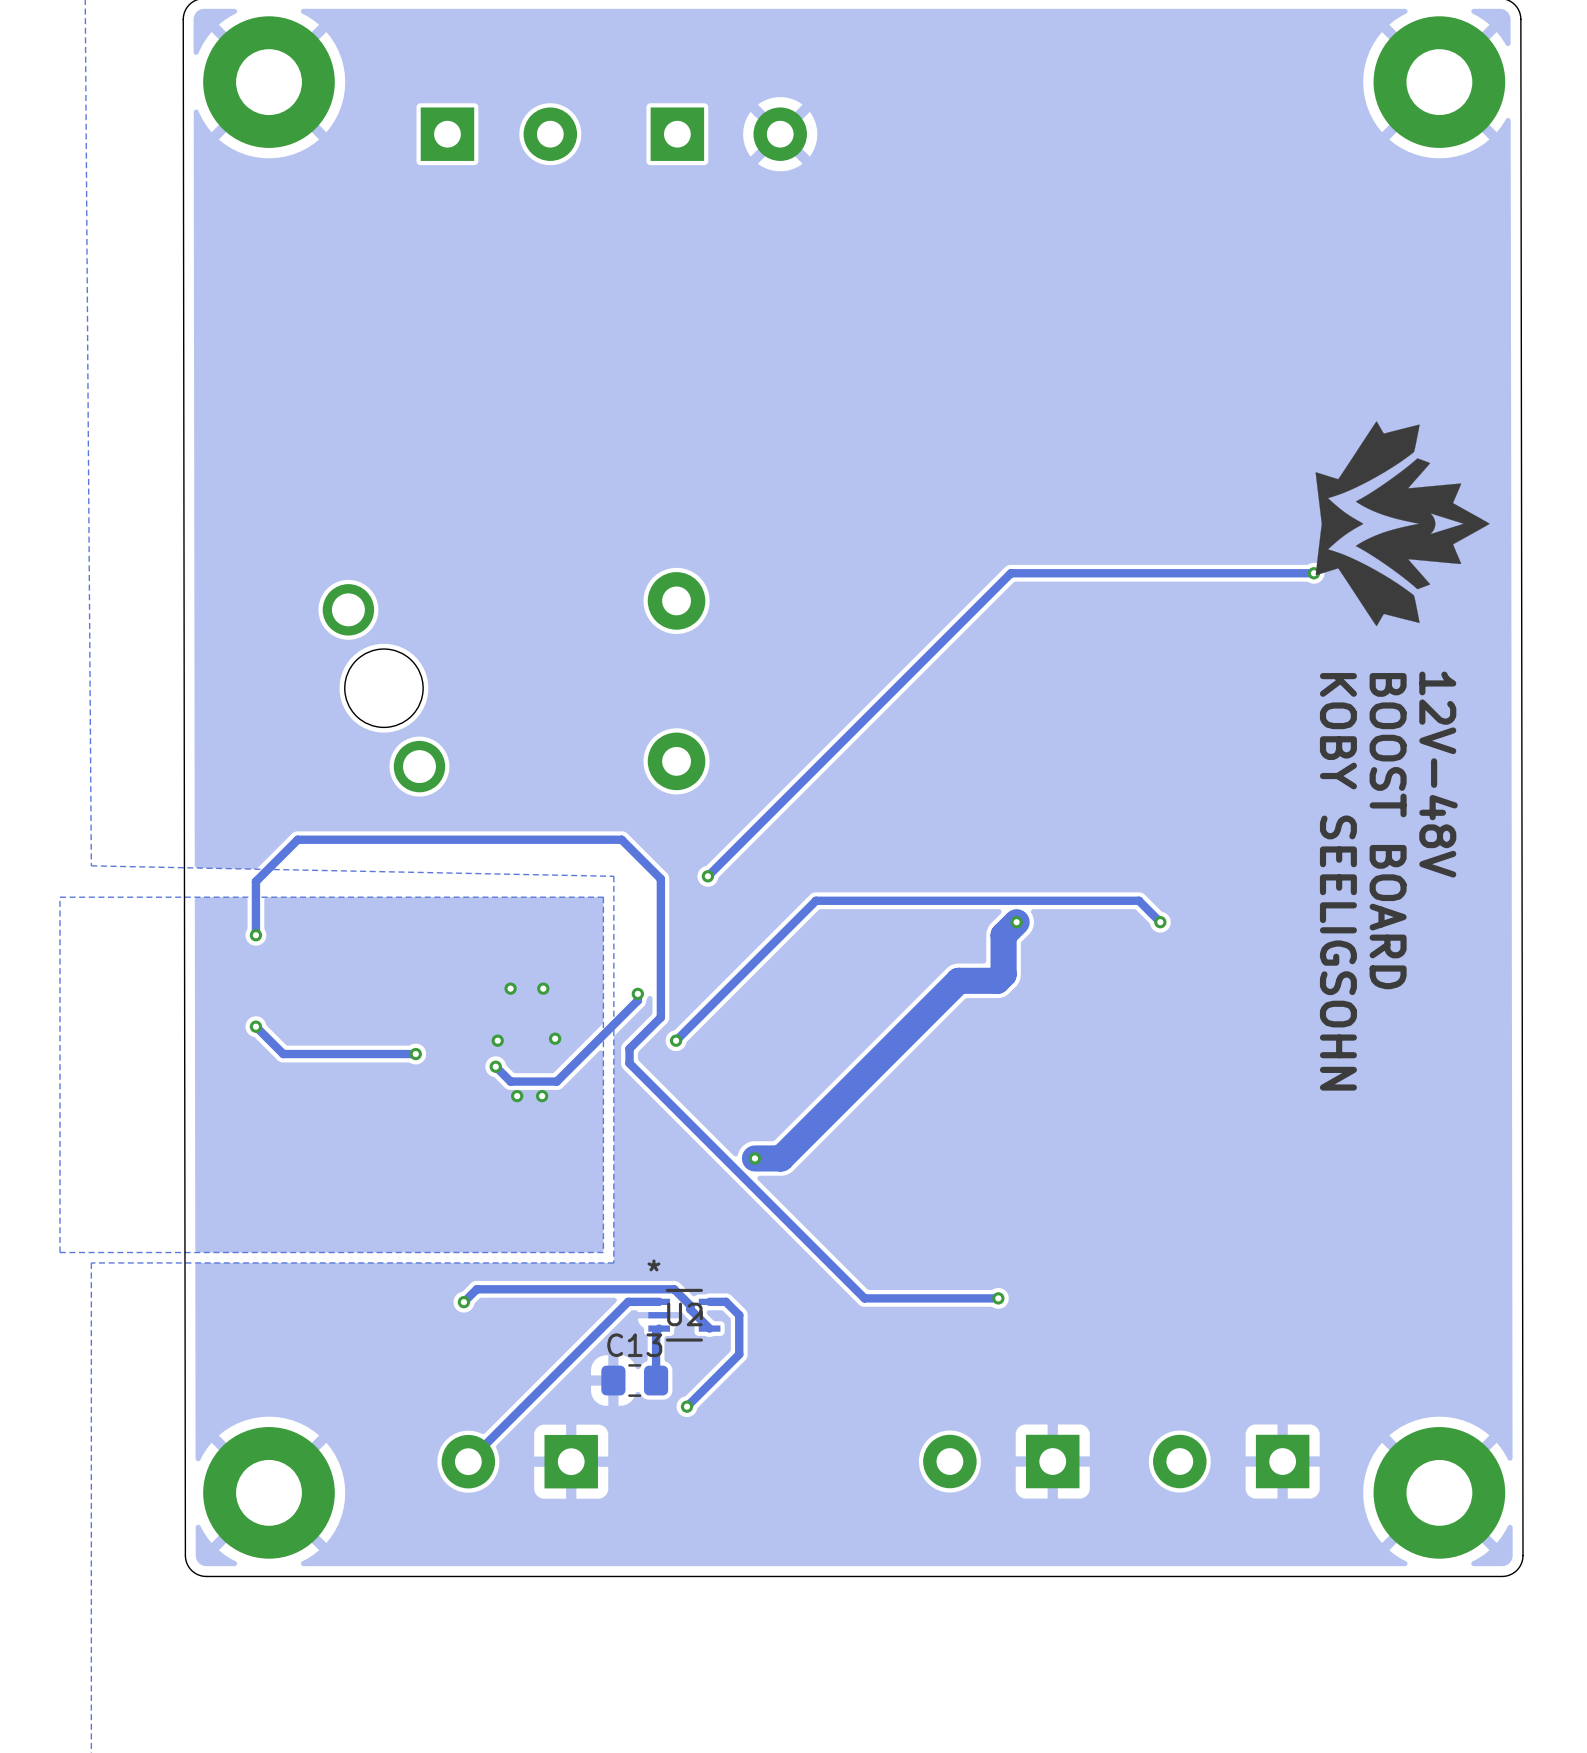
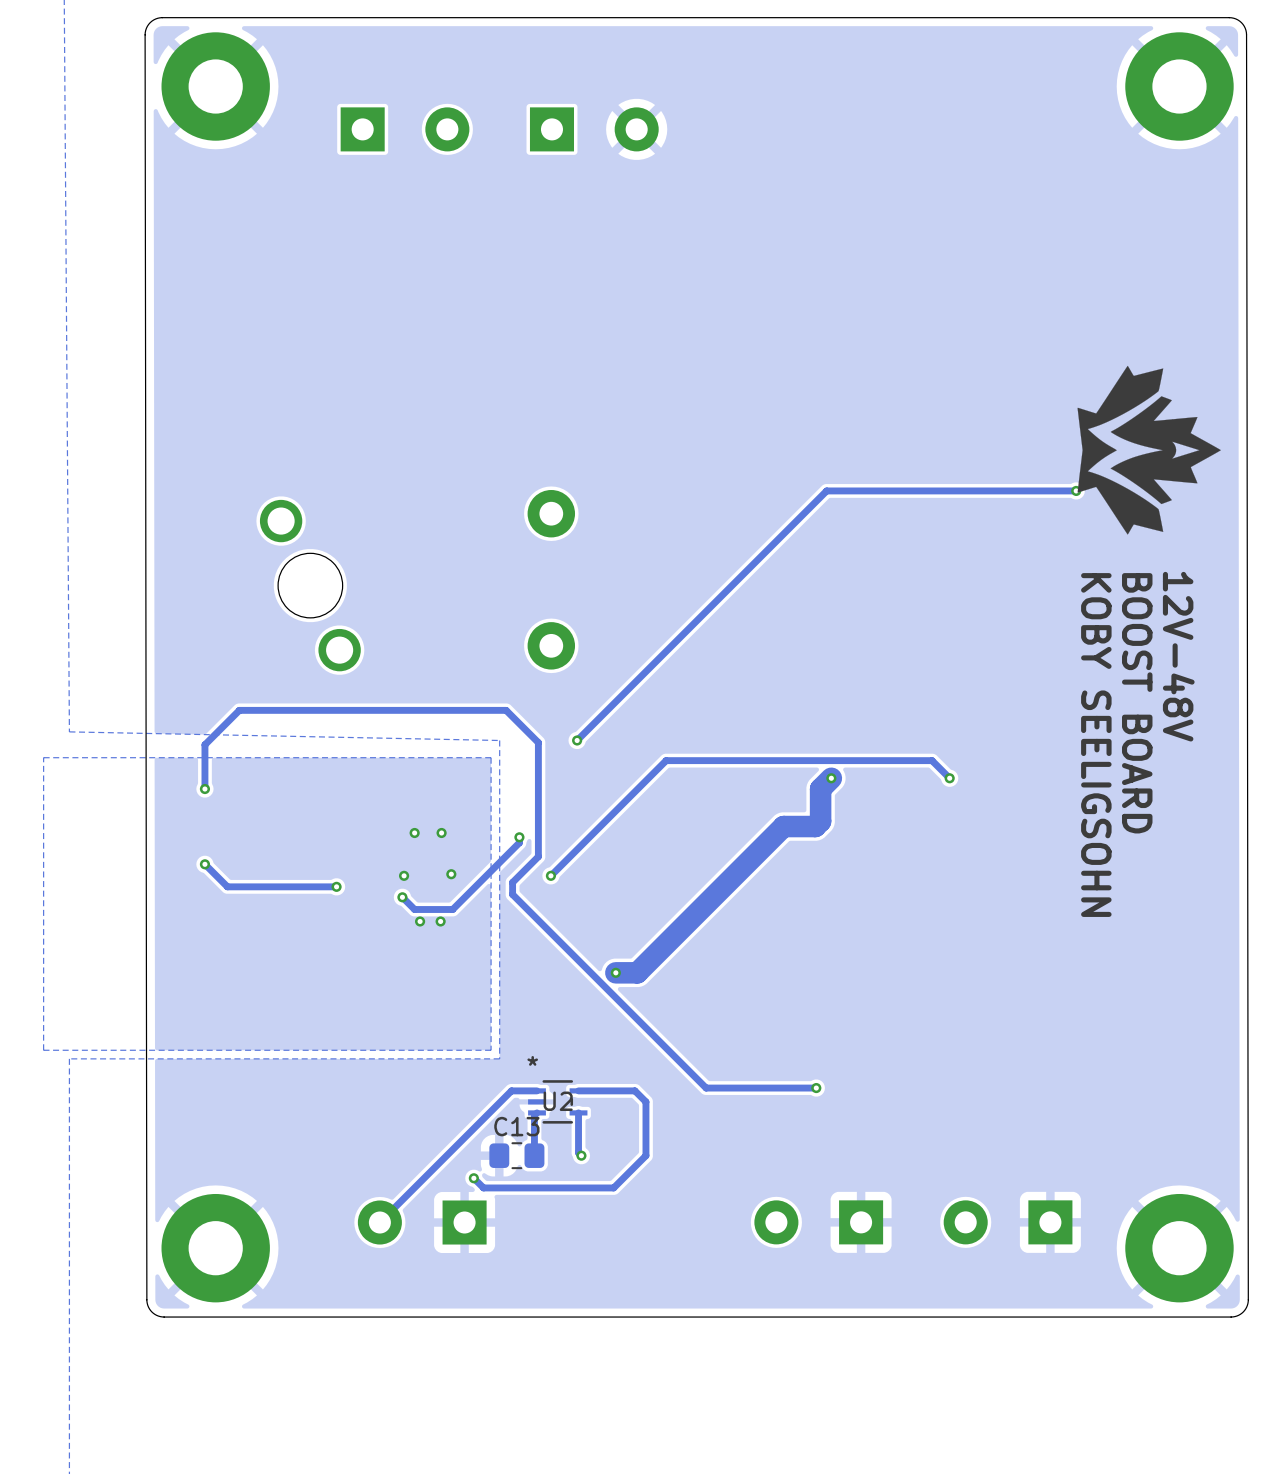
track: (725, 1301) (739, 1315) (739, 1354) (686, 1406) -> (591, 1090) (634, 1090) (645, 1101) (645, 1155) (613, 1187) (483, 1187) (473, 1178)
track: (463, 1302) (476, 1289) (674, 1289) (709, 1328) -> (581, 1155) (578, 1152) (578, 1112)
via: (463, 1302) -> none
via position: (686, 1406) -> (581, 1155)
via: none -> (473, 1178)

